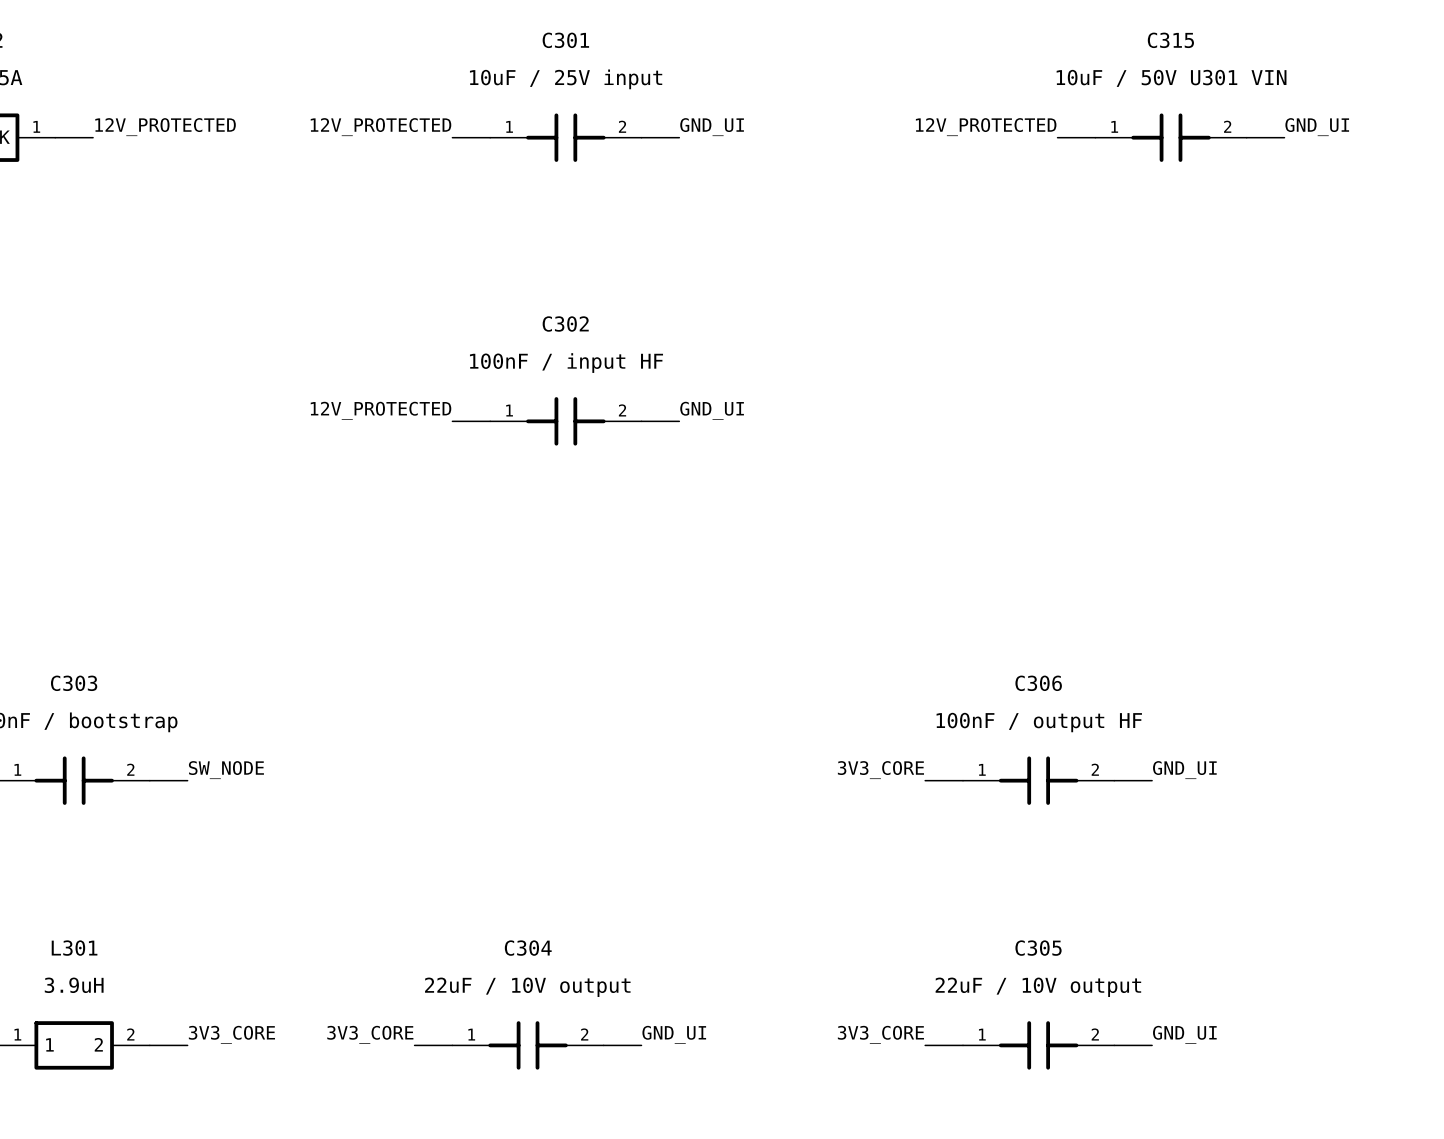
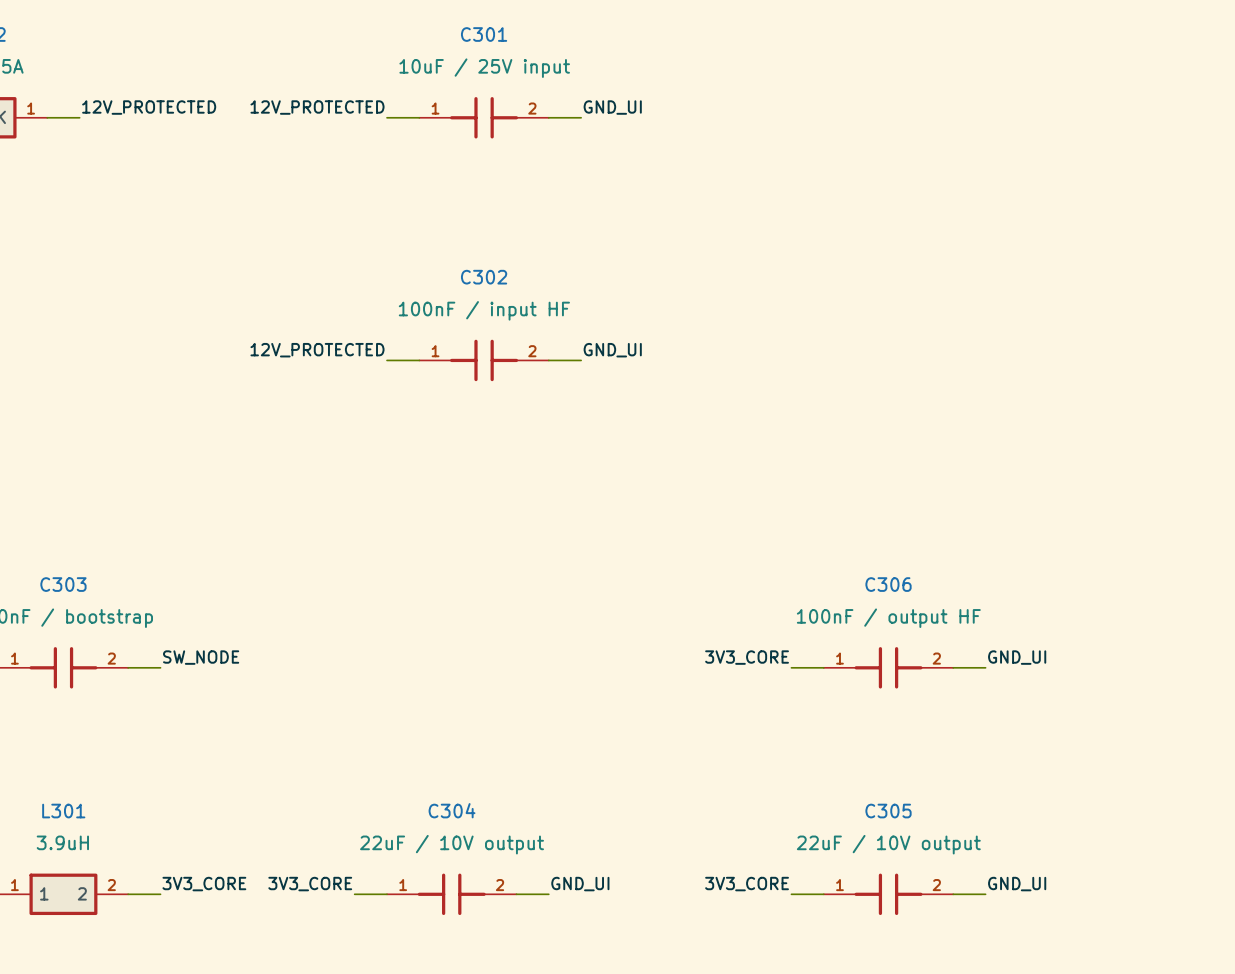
label: 12V_PROTECTED (986, 127) -> none
label: GND_UI (1317, 127) -> none
wire: (1057, 137) (1095, 137) -> none
C315: 10uF / 50V U301 VIN (1171, 137) -> none
wire: (1246, 137) (1284, 137) -> none

